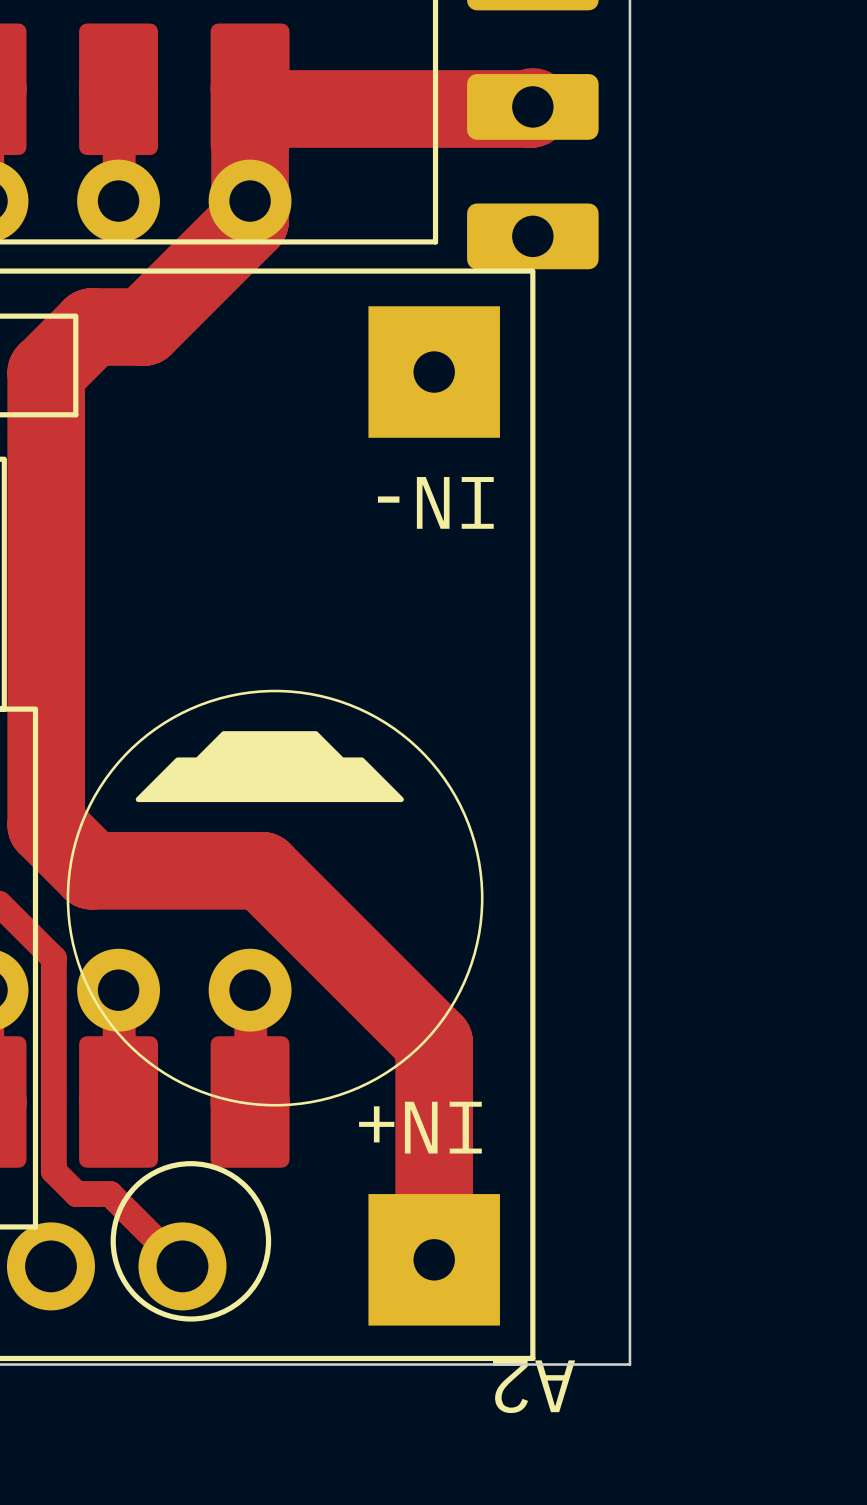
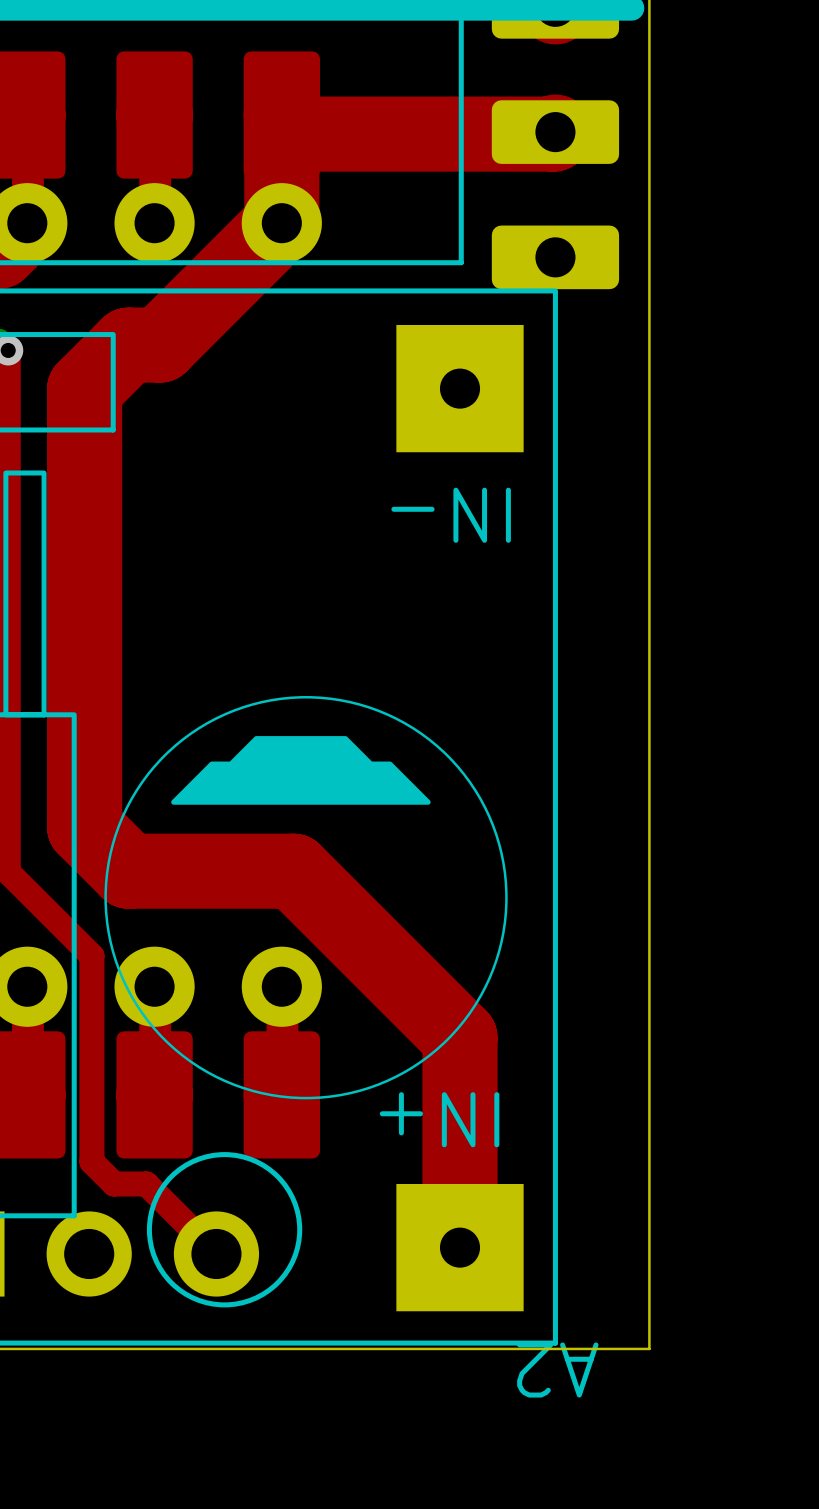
top track: (250, 201) (250, 220) (143, 327) (124, 327) -> (281, 223) (159, 345)

